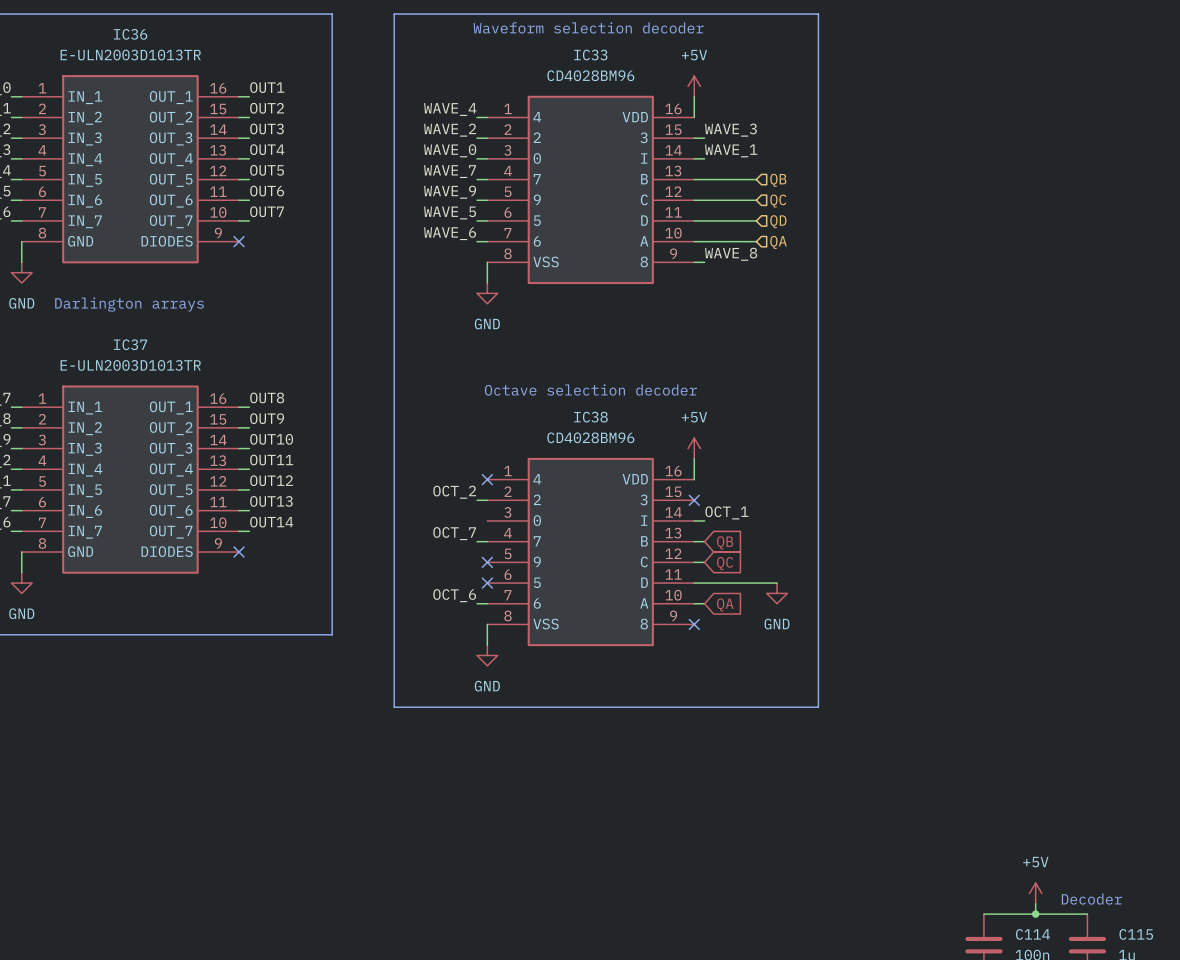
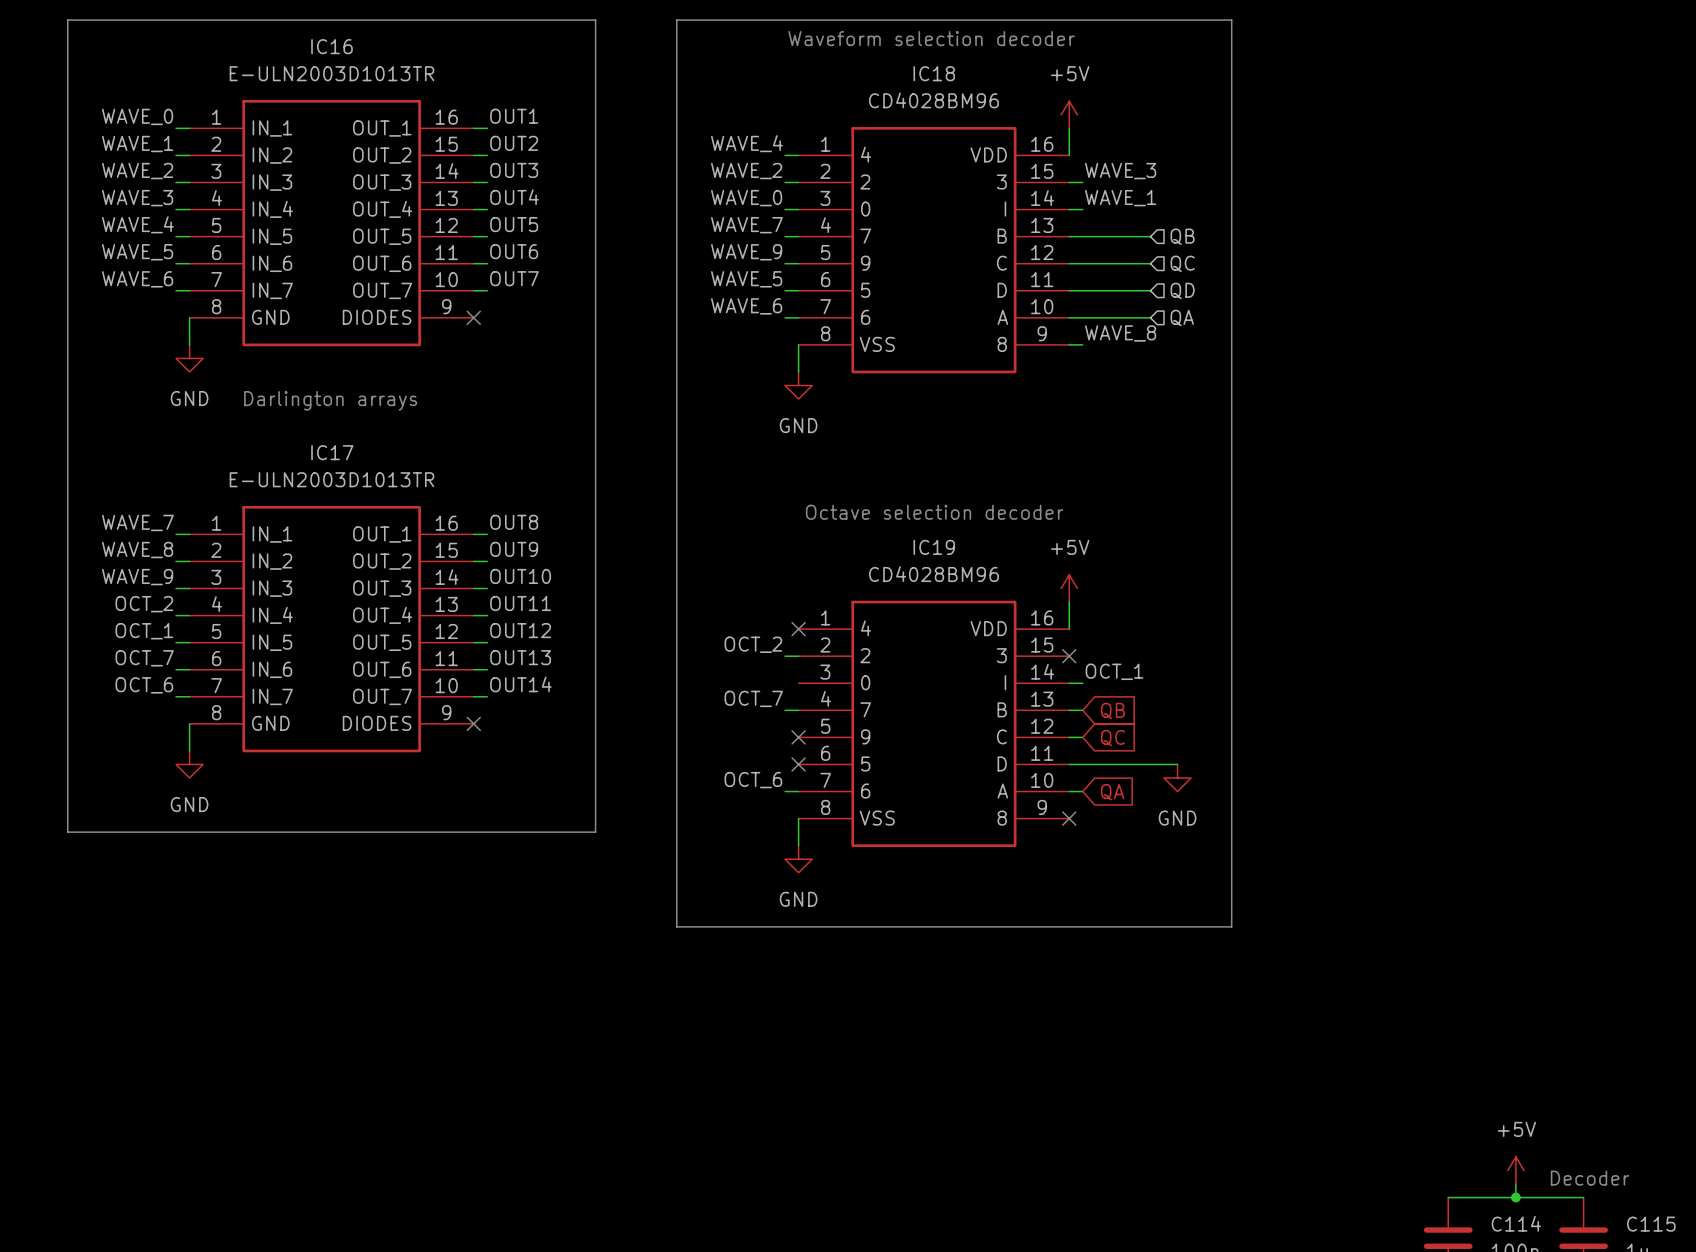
IC36 name: IC36 (130, 34) -> IC16 (331, 46)
IC33 name: IC33 (590, 55) -> IC18 (934, 73)
IC37 name: IC37 (130, 344) -> IC17 (332, 452)
IC38 name: IC38 (591, 417) -> IC19 (934, 547)

